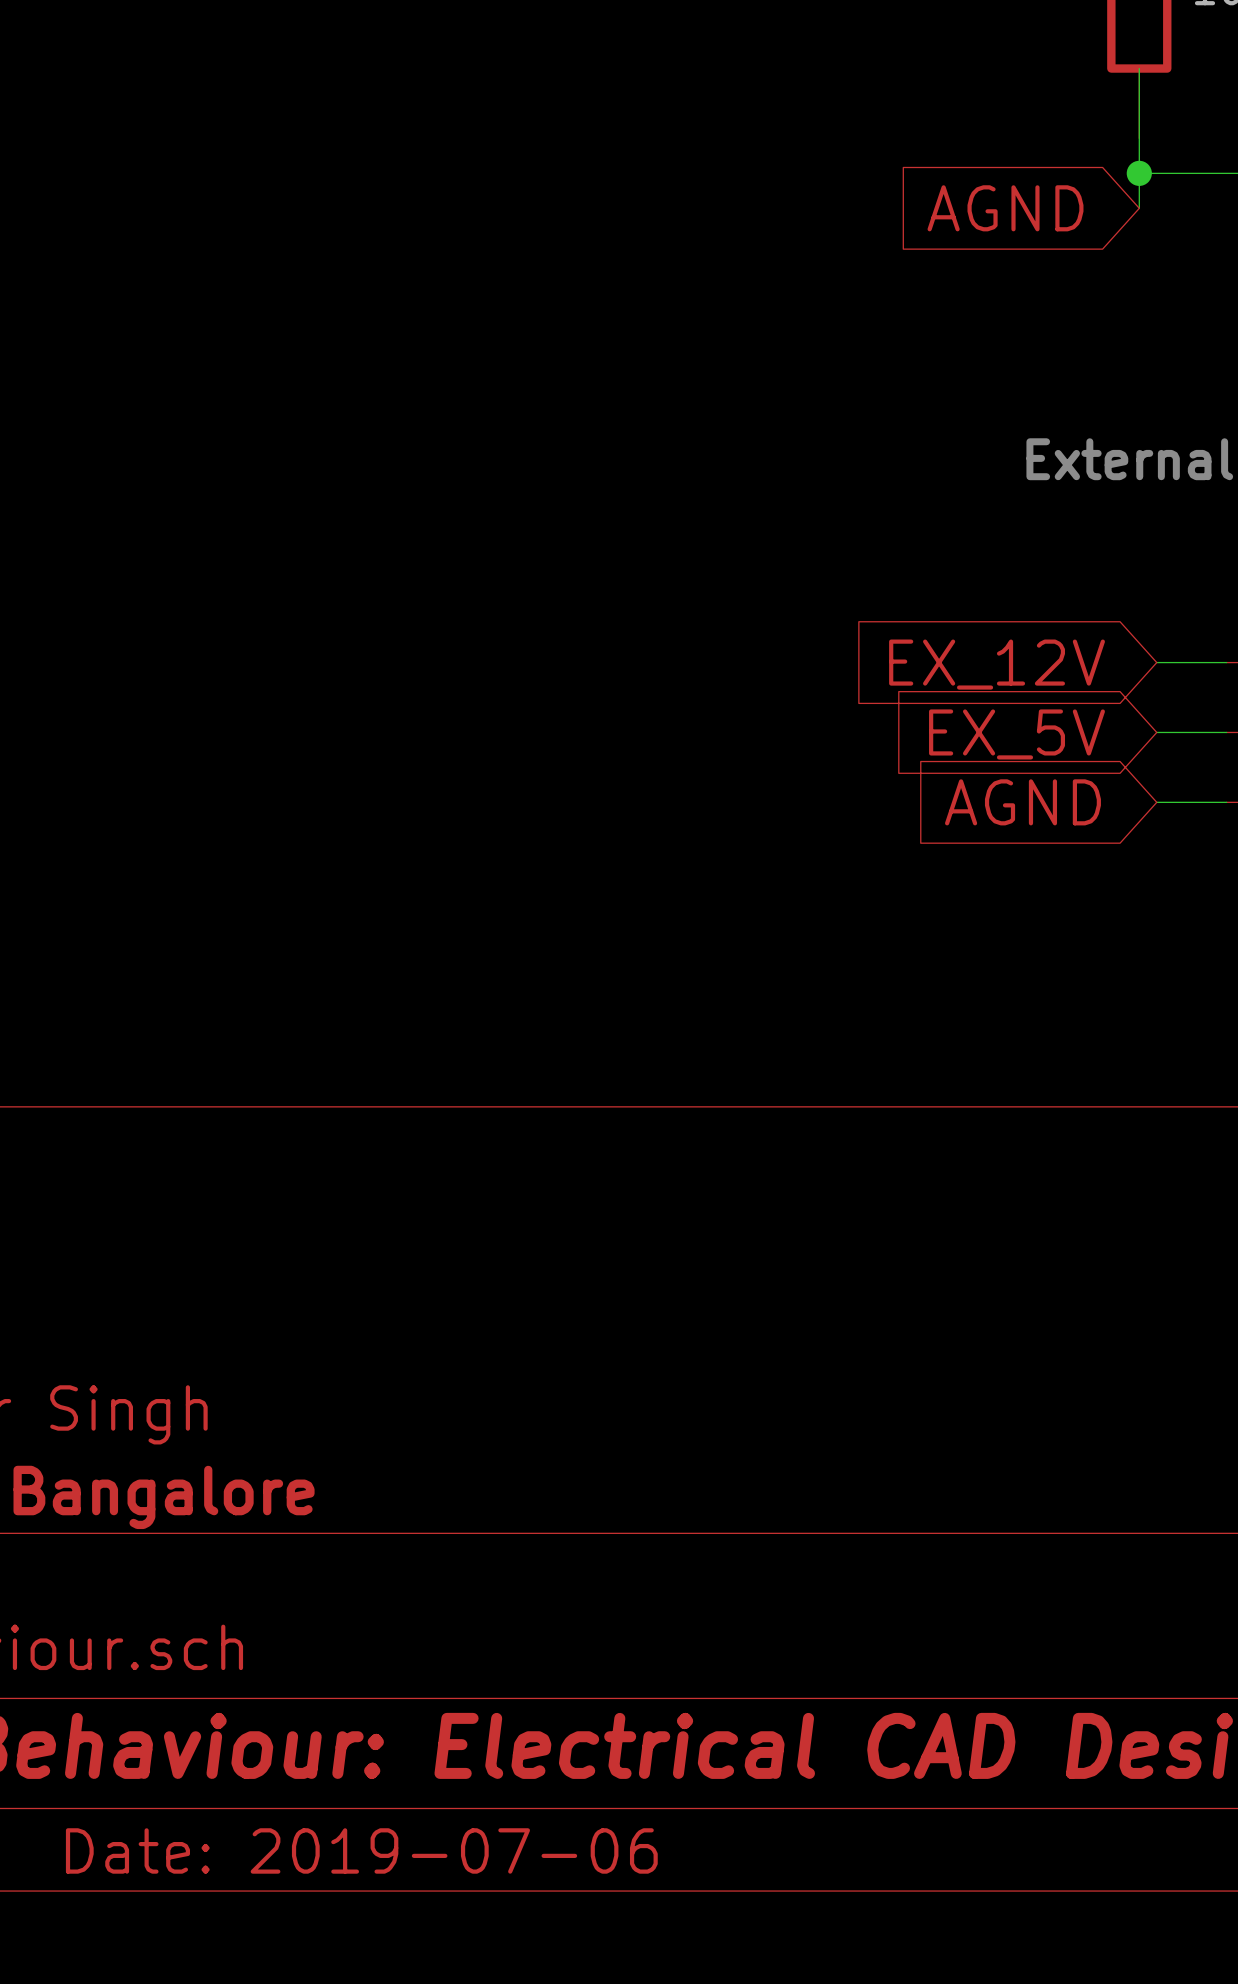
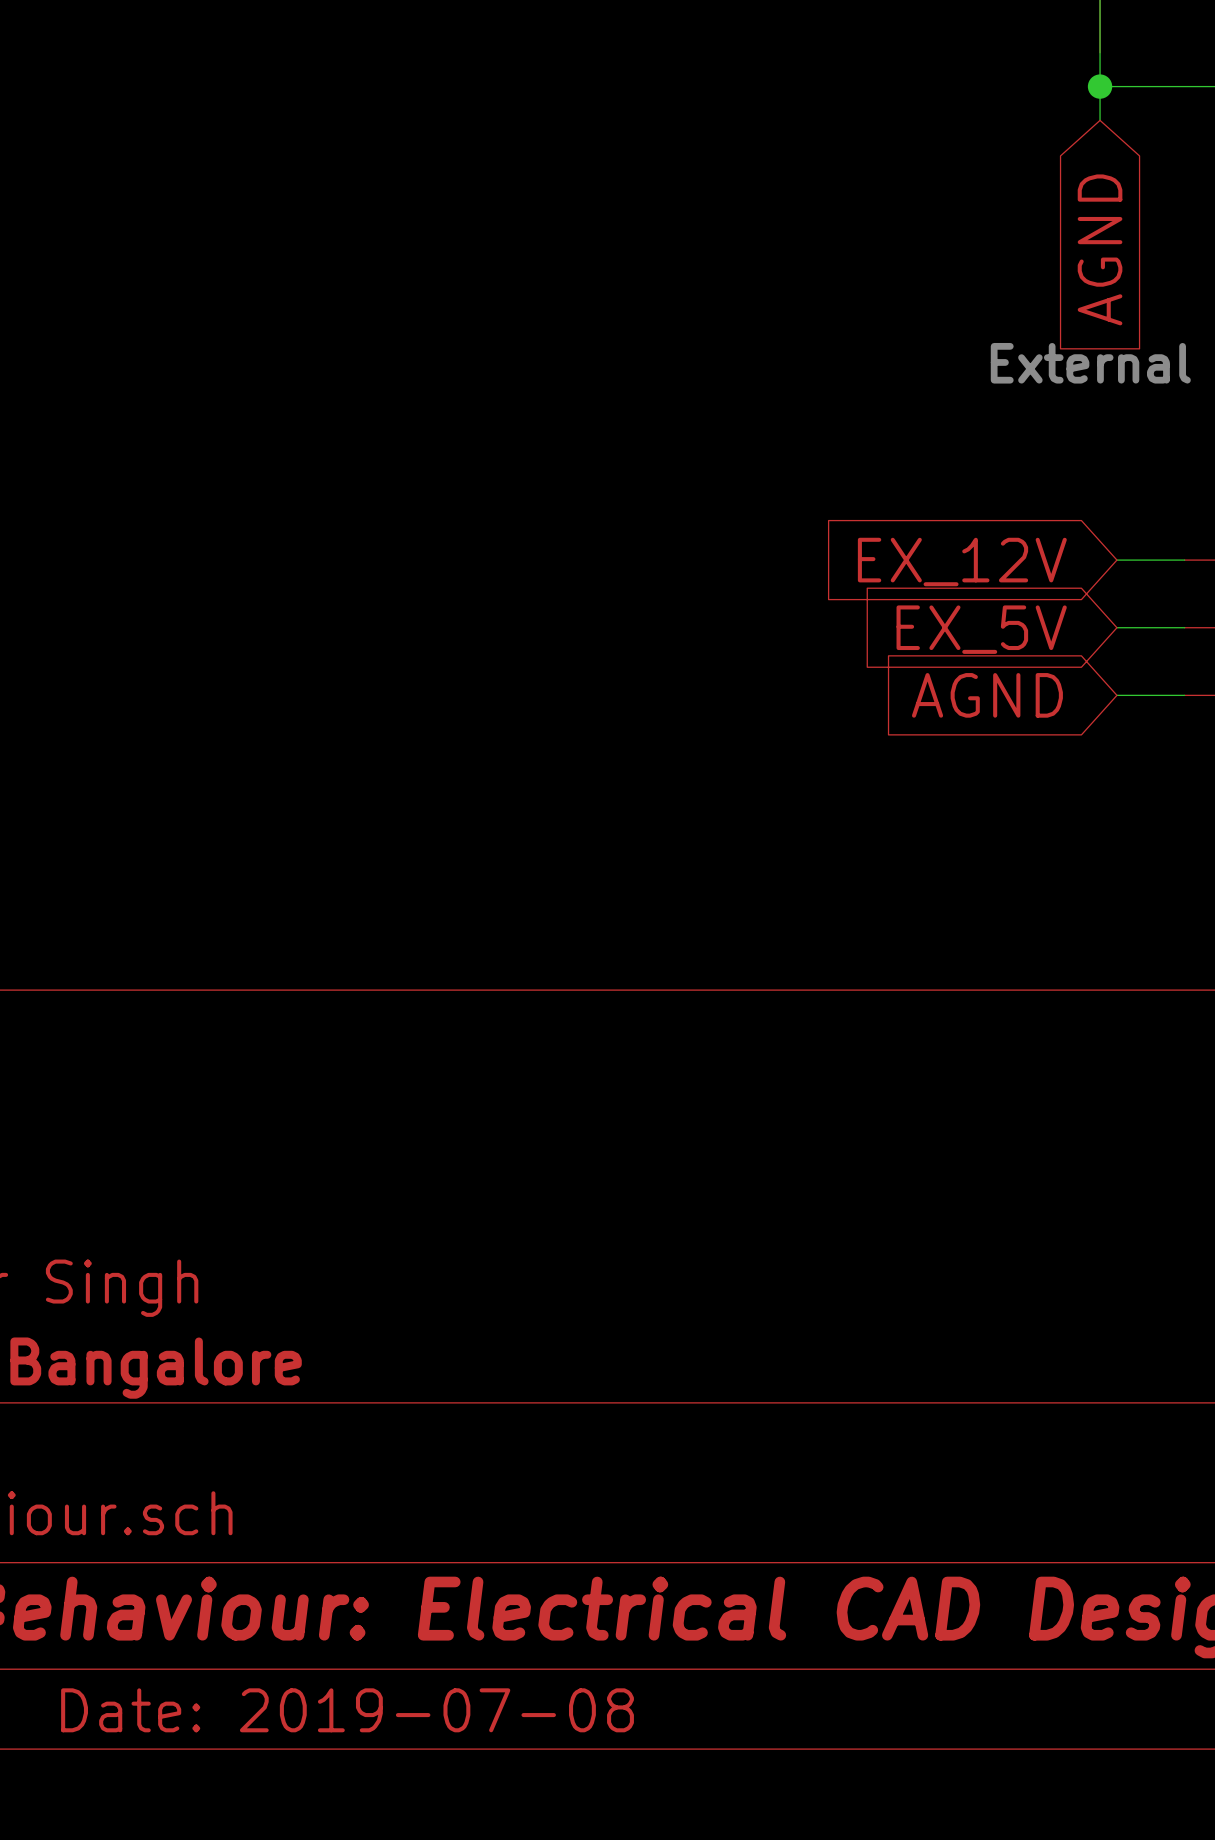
global label rotation: 0° (1005, 208) -> 90° counterclockwise (1100, 249)
title block: Date: 2019-07-06 (361, 1850) -> Date: 2019-07-08 (347, 1710)

